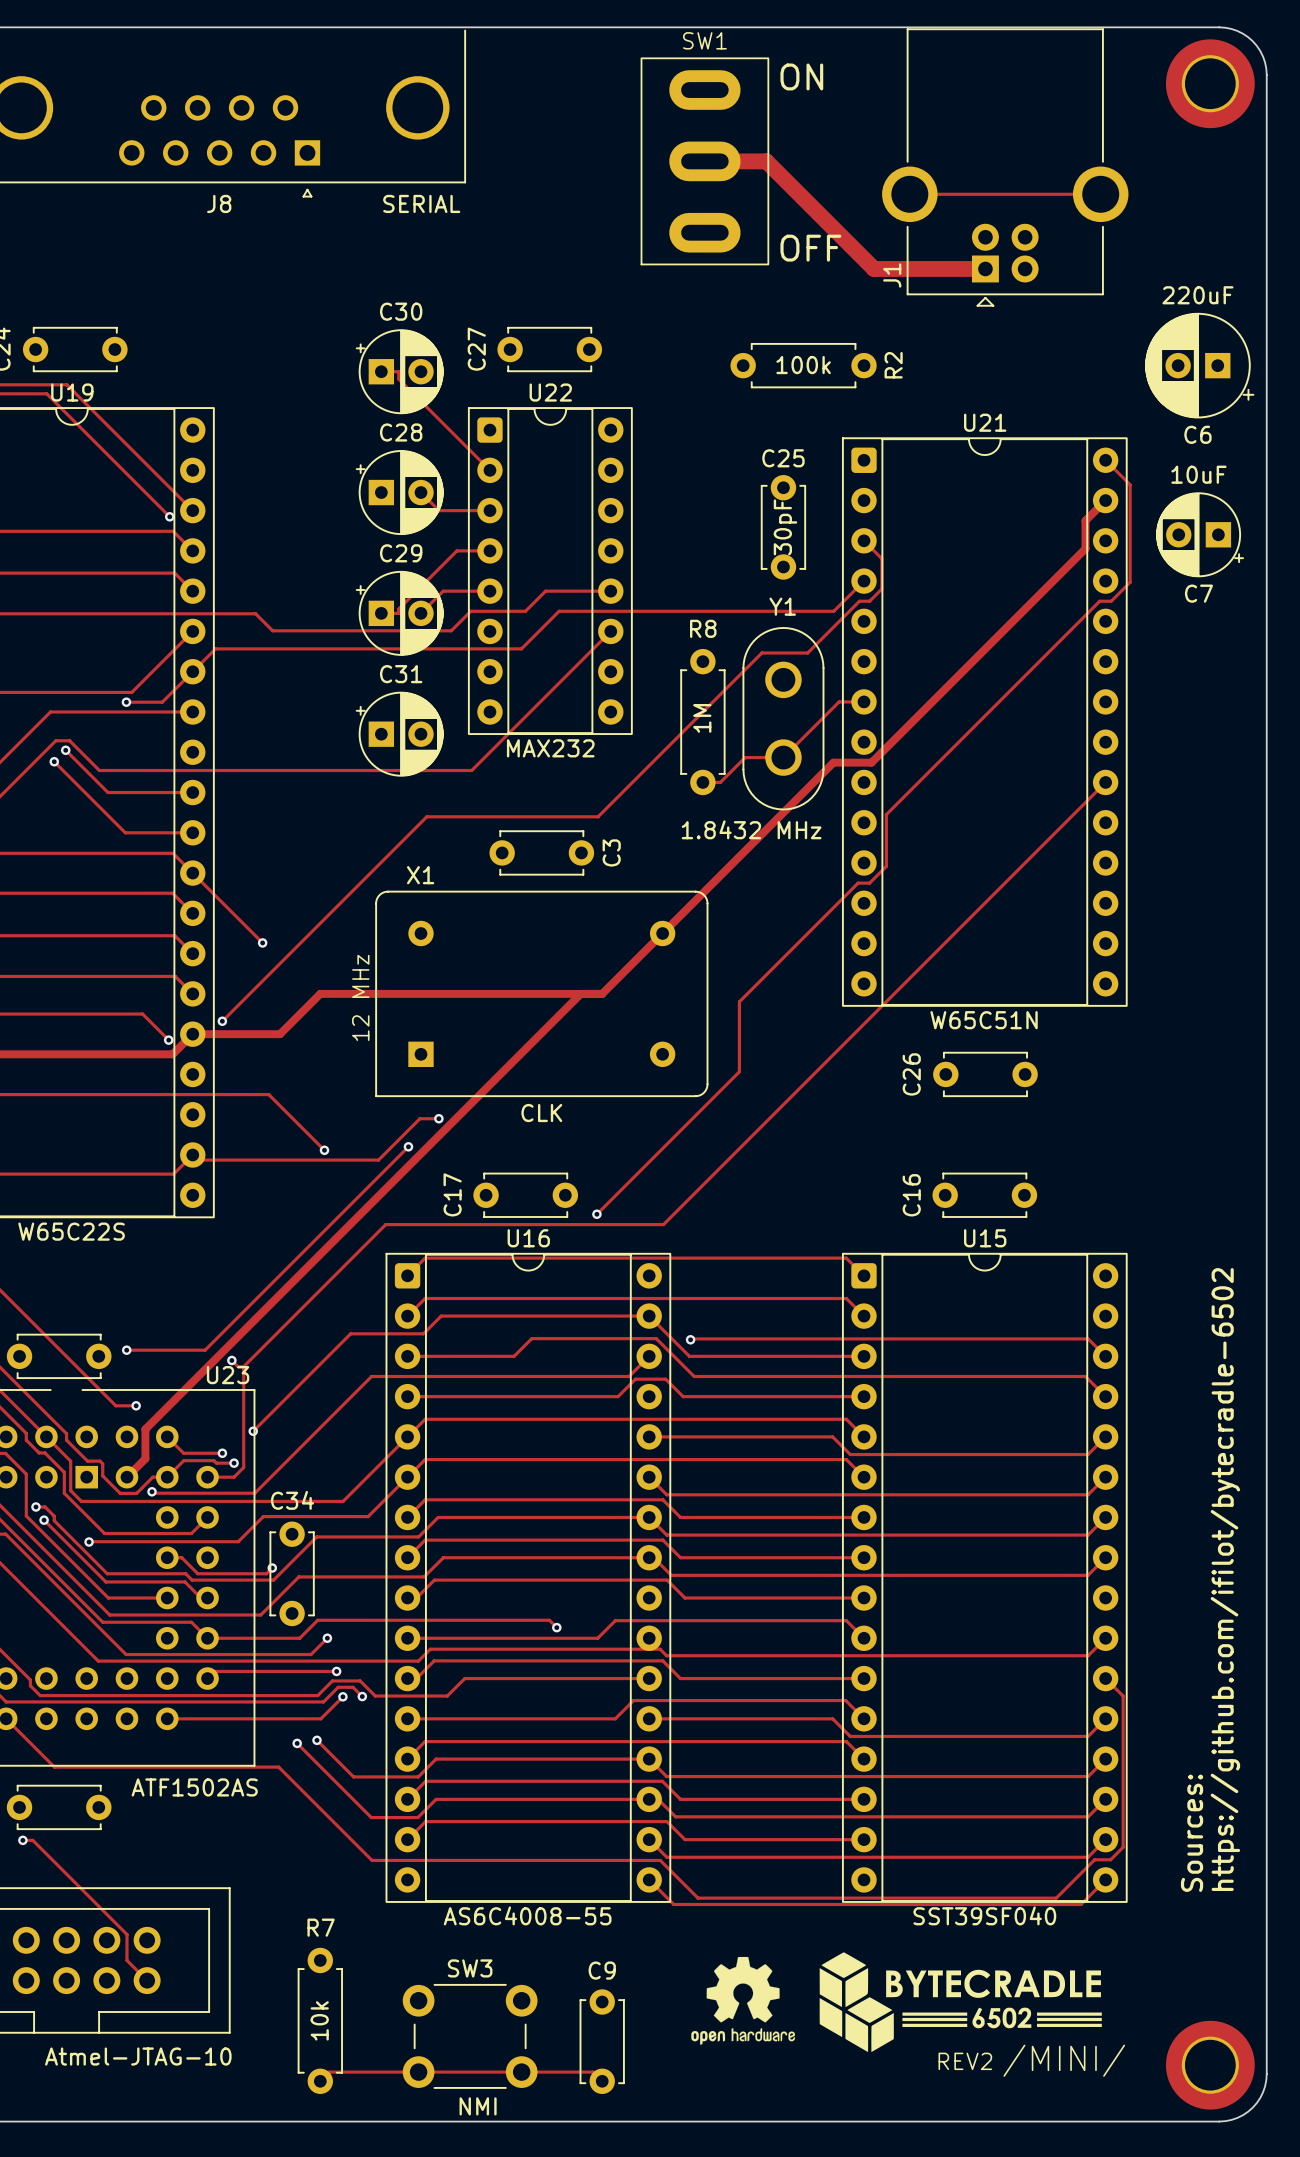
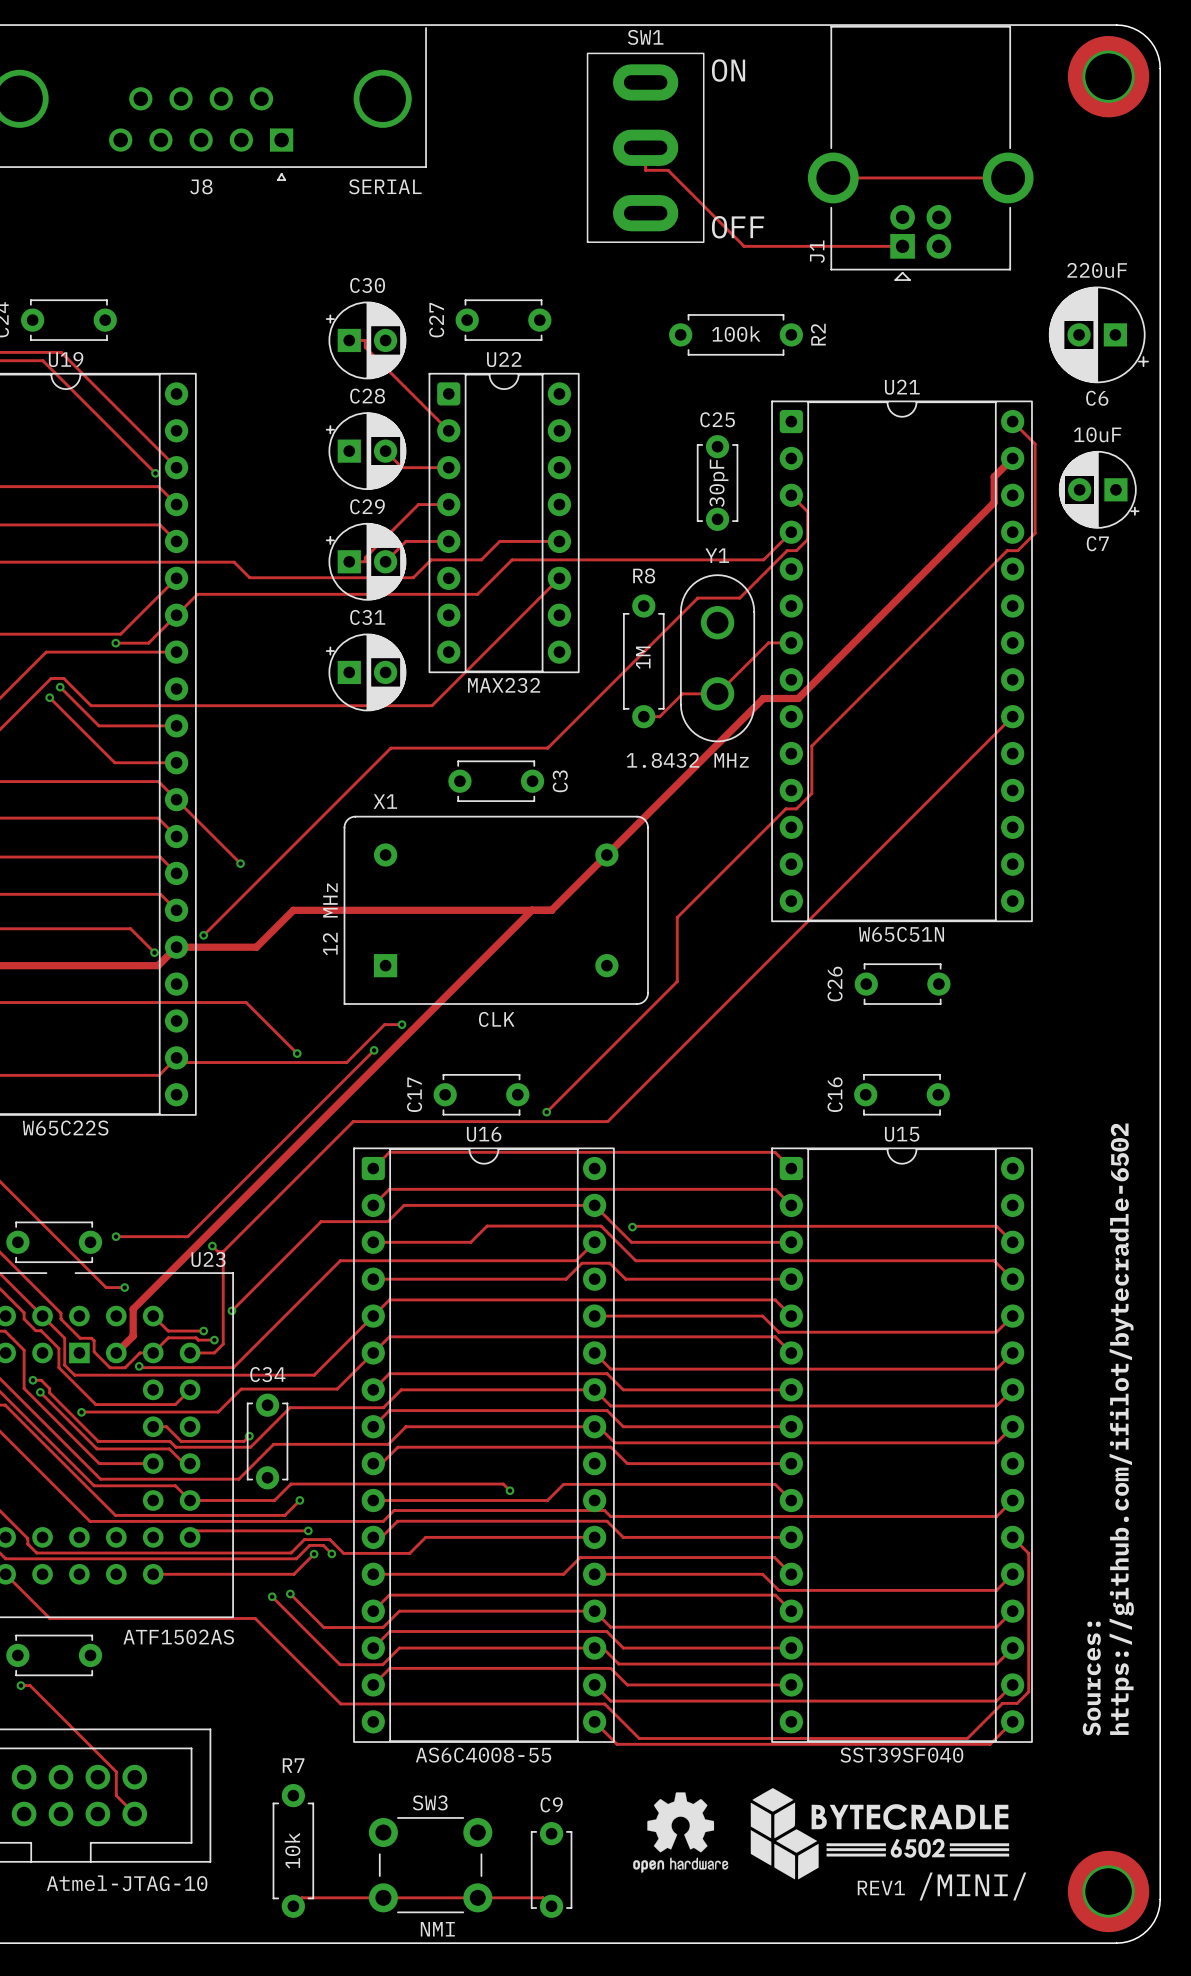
track: (704, 161) (766, 161) (874, 268) -> (645, 147) (645, 170) (668, 170) (744, 246) (800, 246)
track width: thick (874, 268) (985, 268) -> thin (800, 246) (902, 246)
text: REV2 (965, 2061) -> REV1 (881, 1888)

